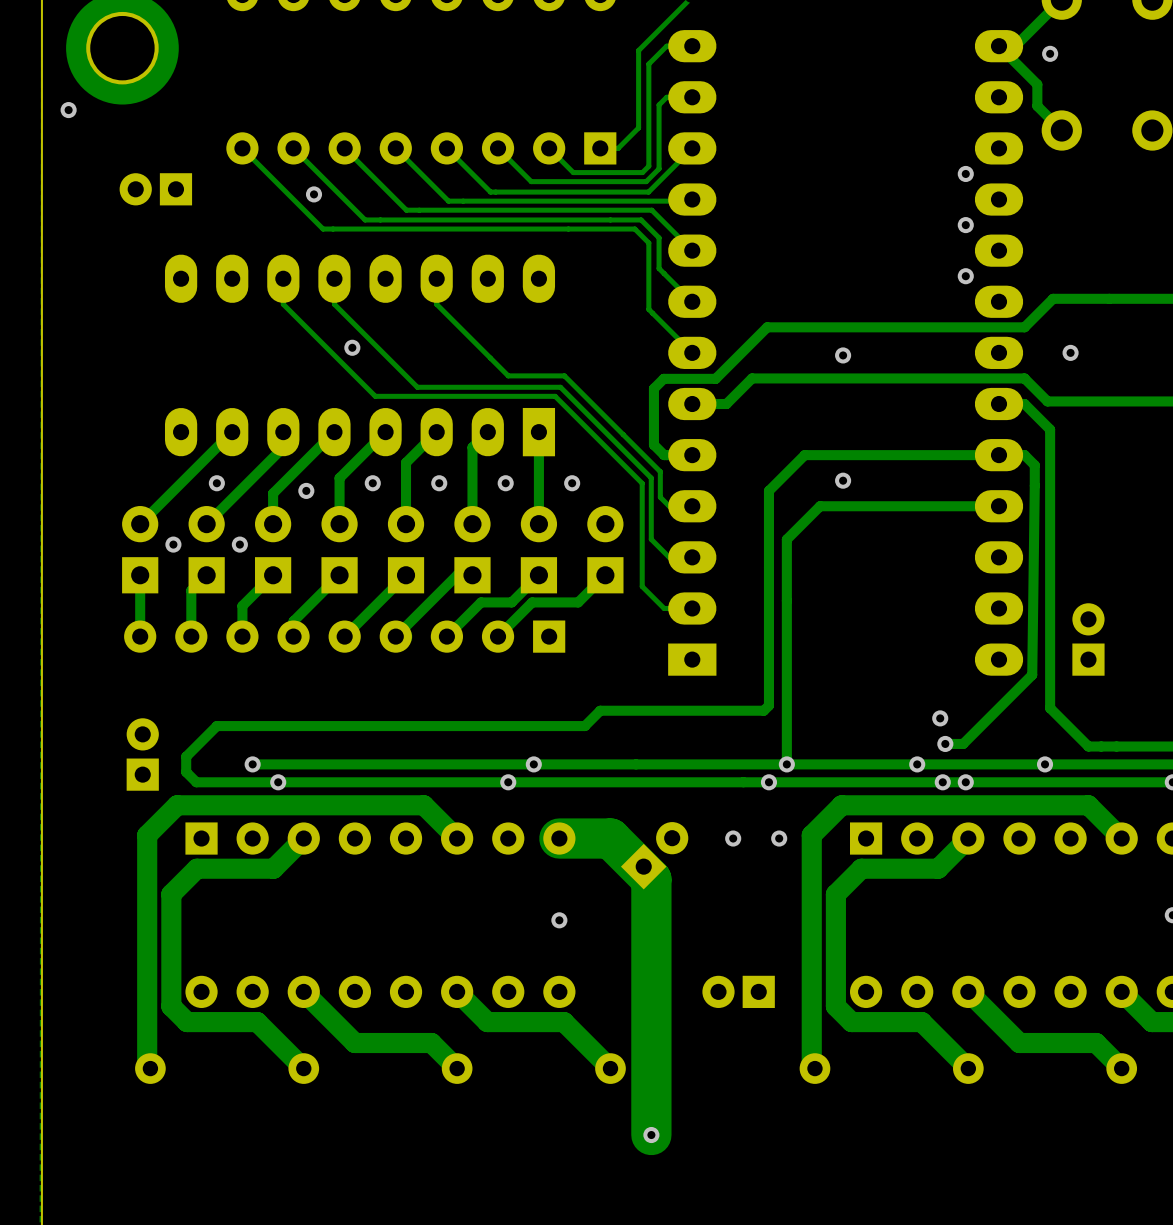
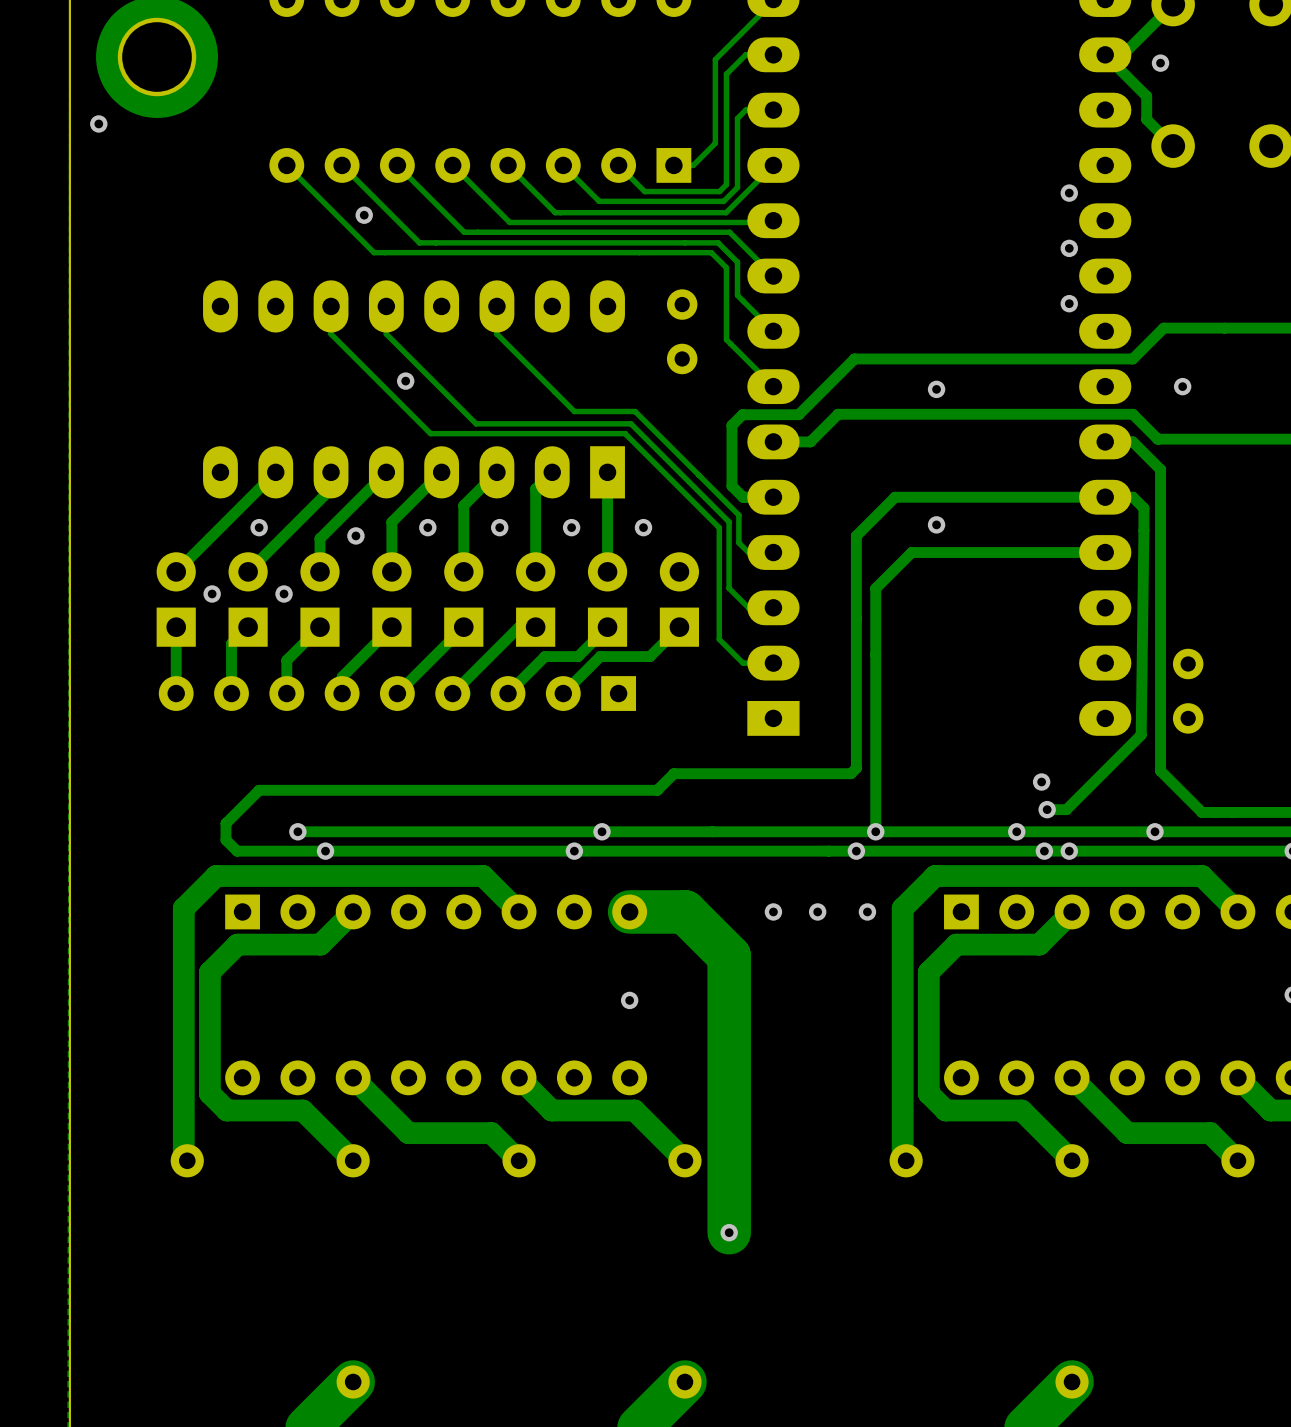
part: (155, 189) -> none
part: none -> (682, 331)
part footprint: [1072, 603, 1105, 676] -> [1172, 648, 1204, 734]
part: (142, 754) -> none
via: none -> (773, 911)
part: (654, 855) -> none
part: (738, 991) -> none

